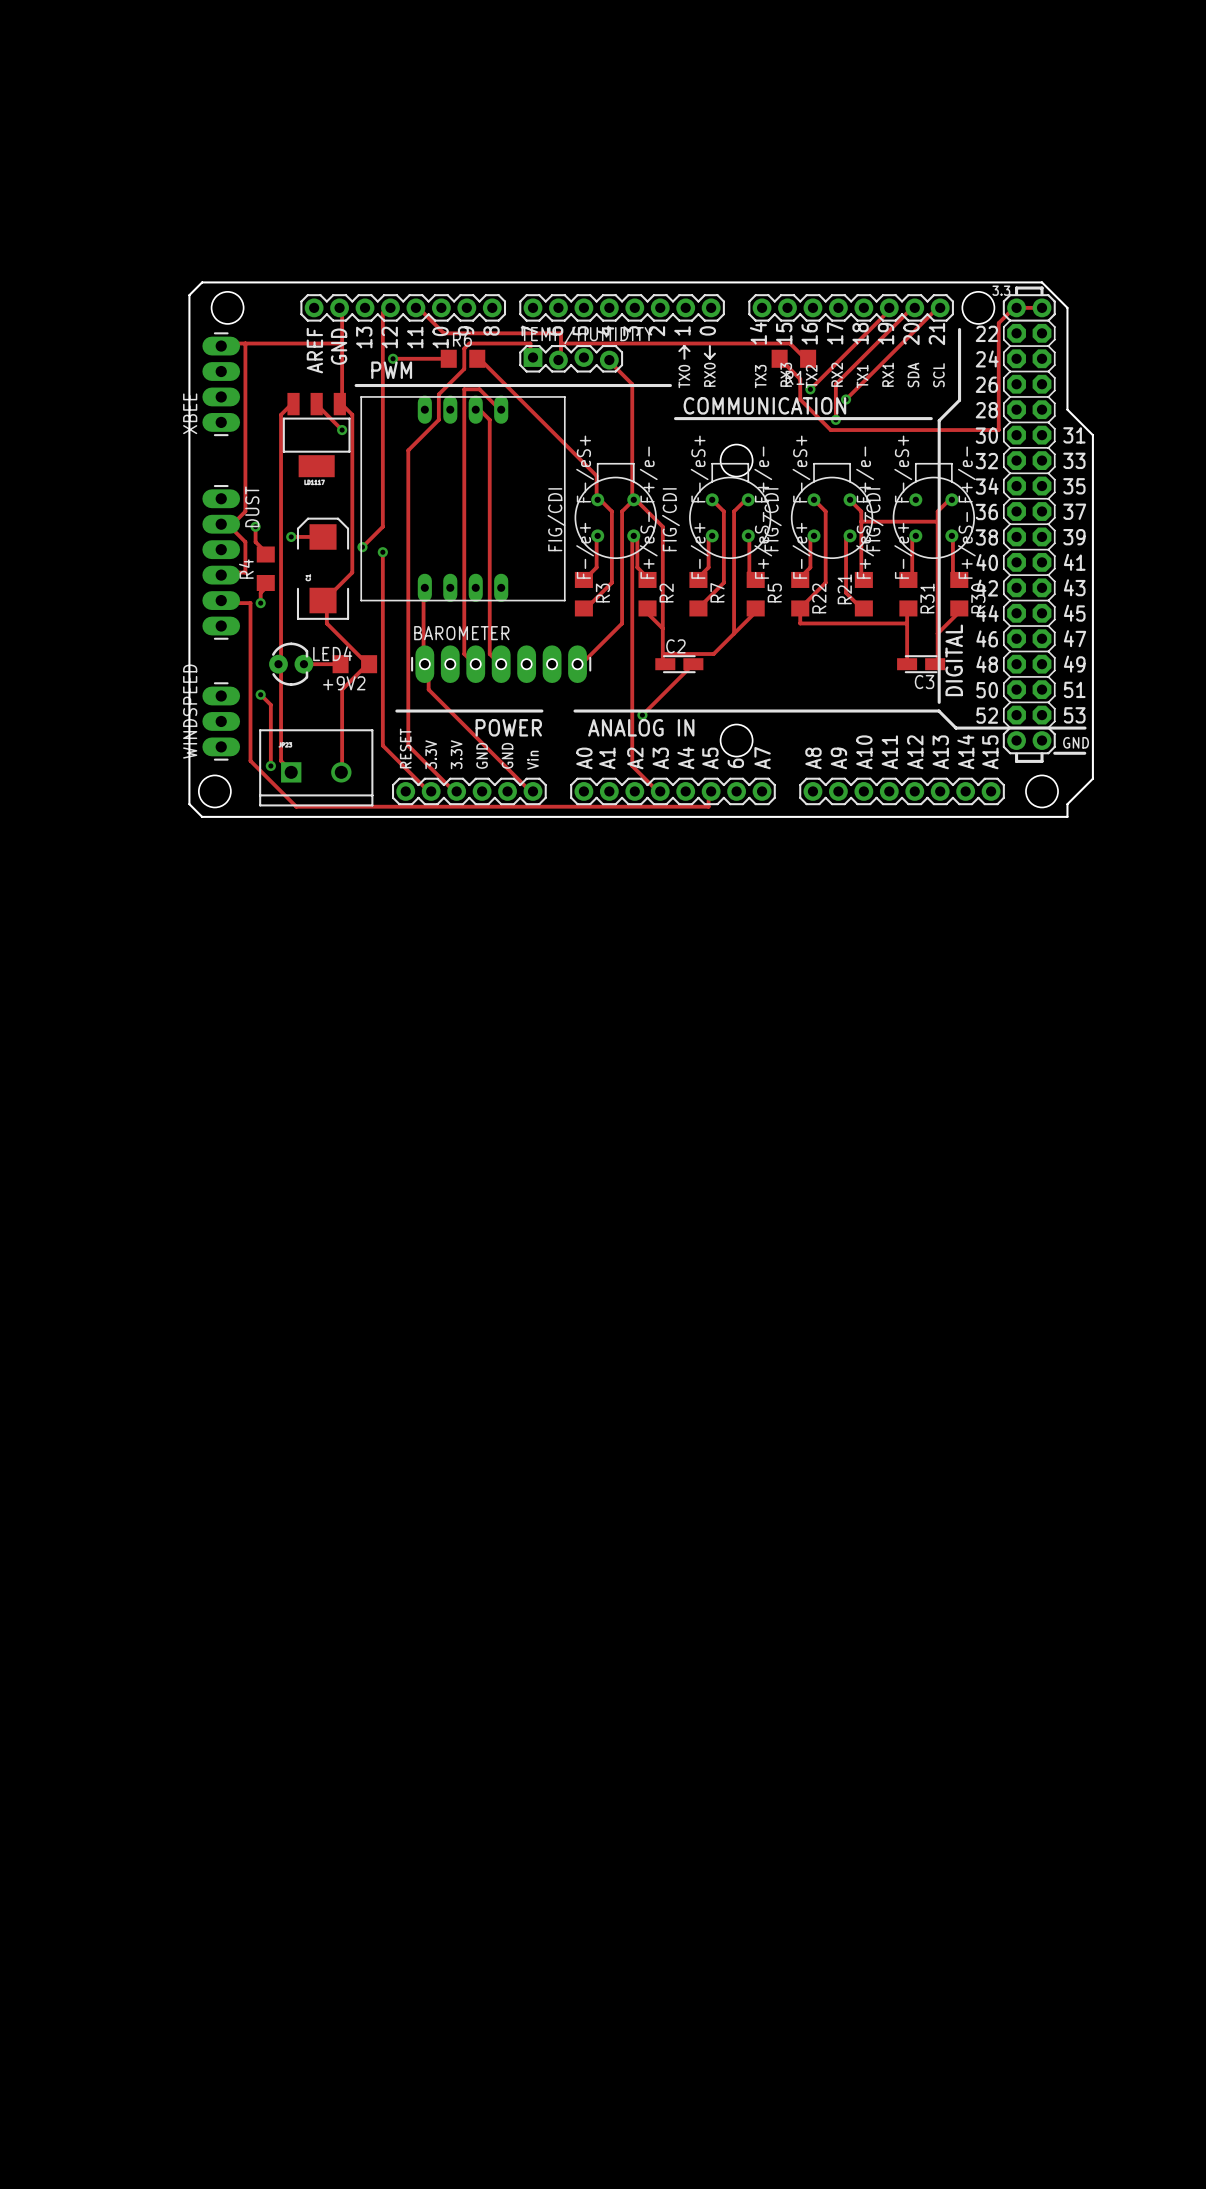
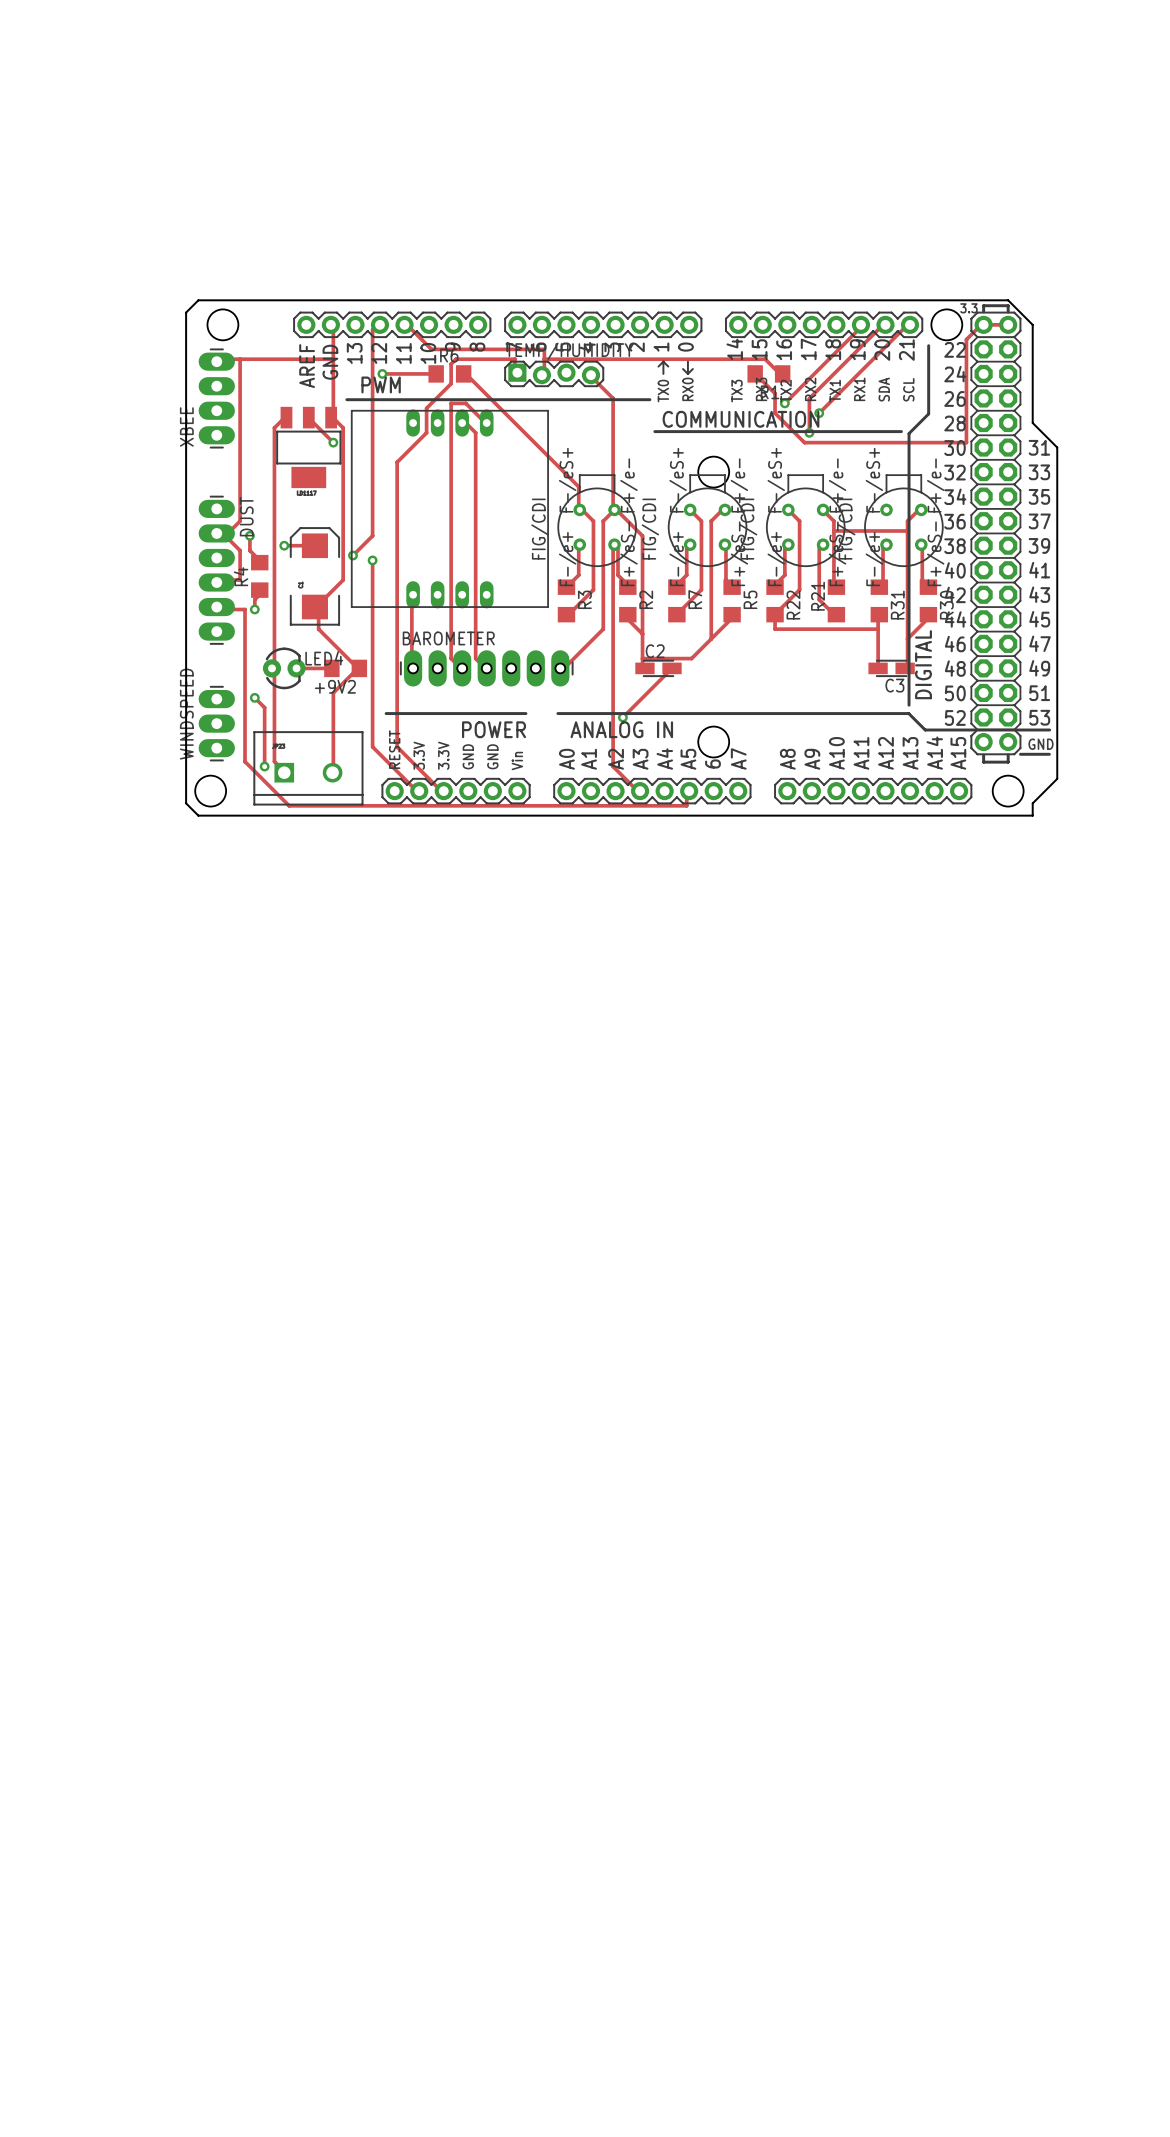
track: (423, 664) (428, 664) (428, 689) (530, 791) -> none

